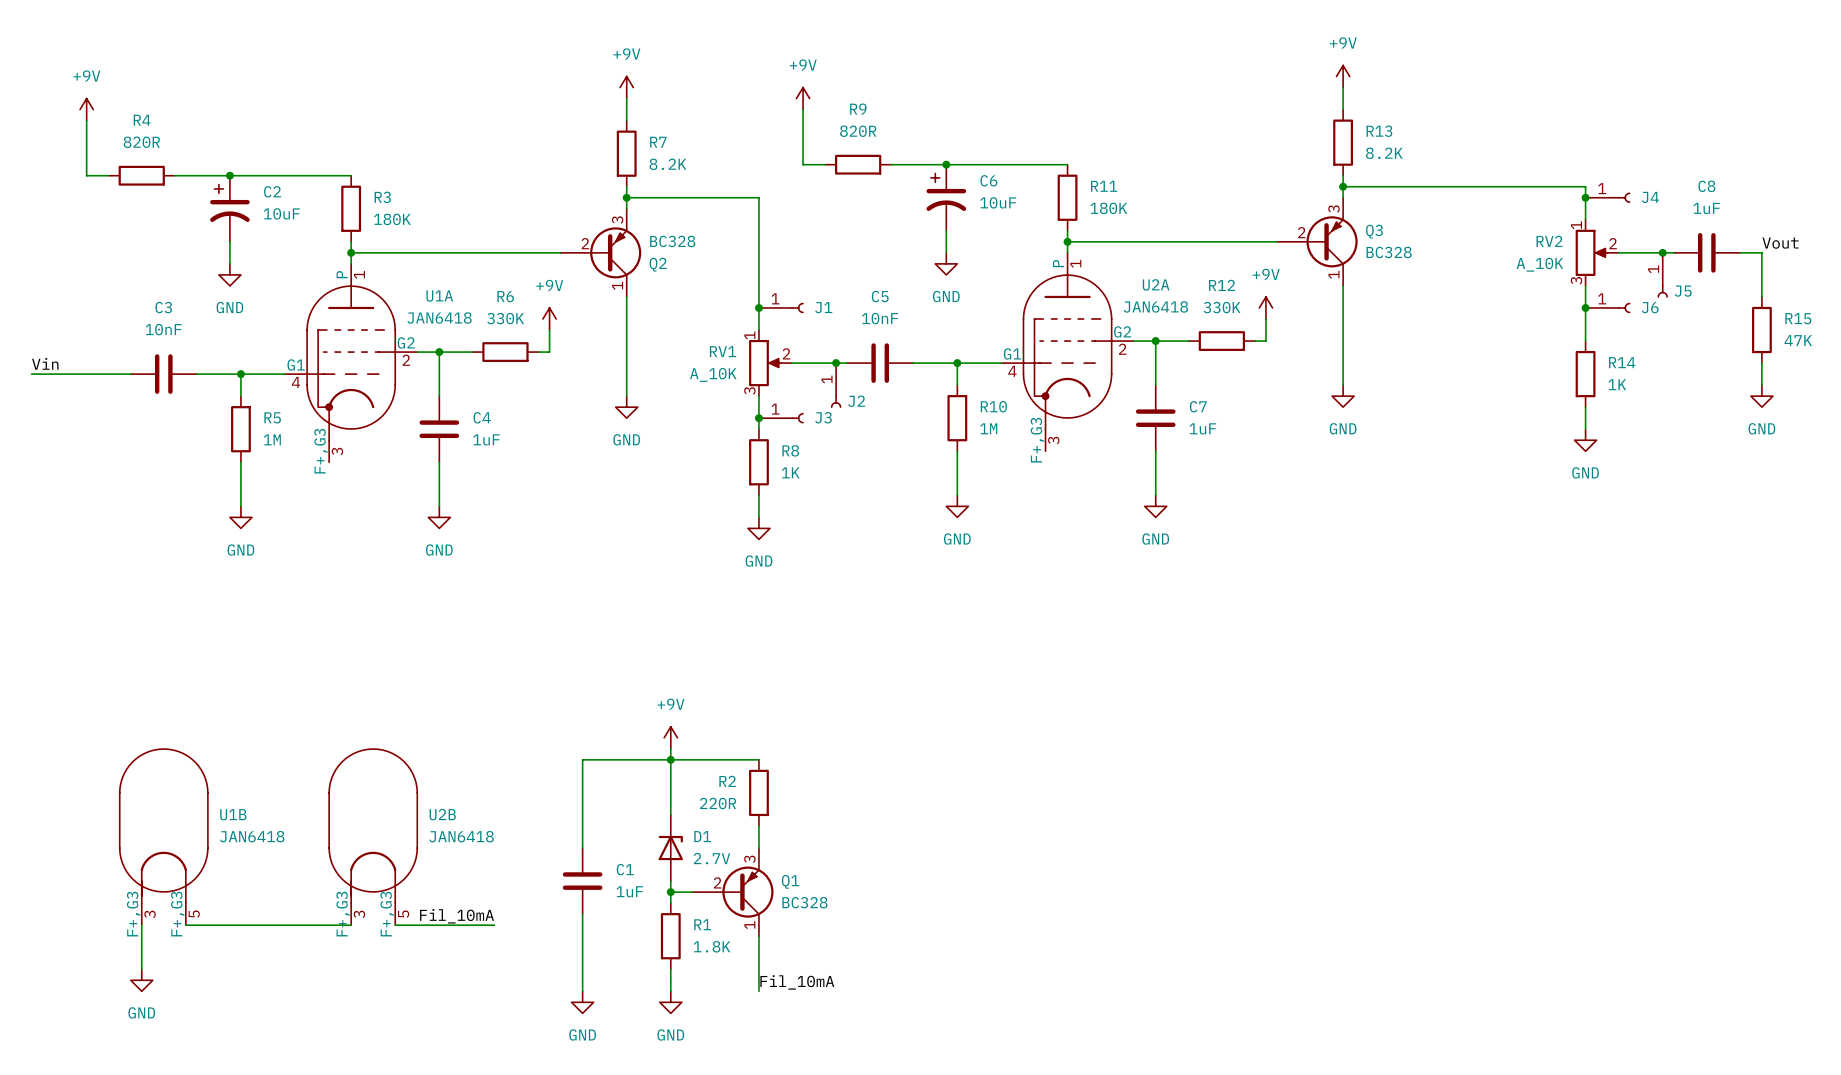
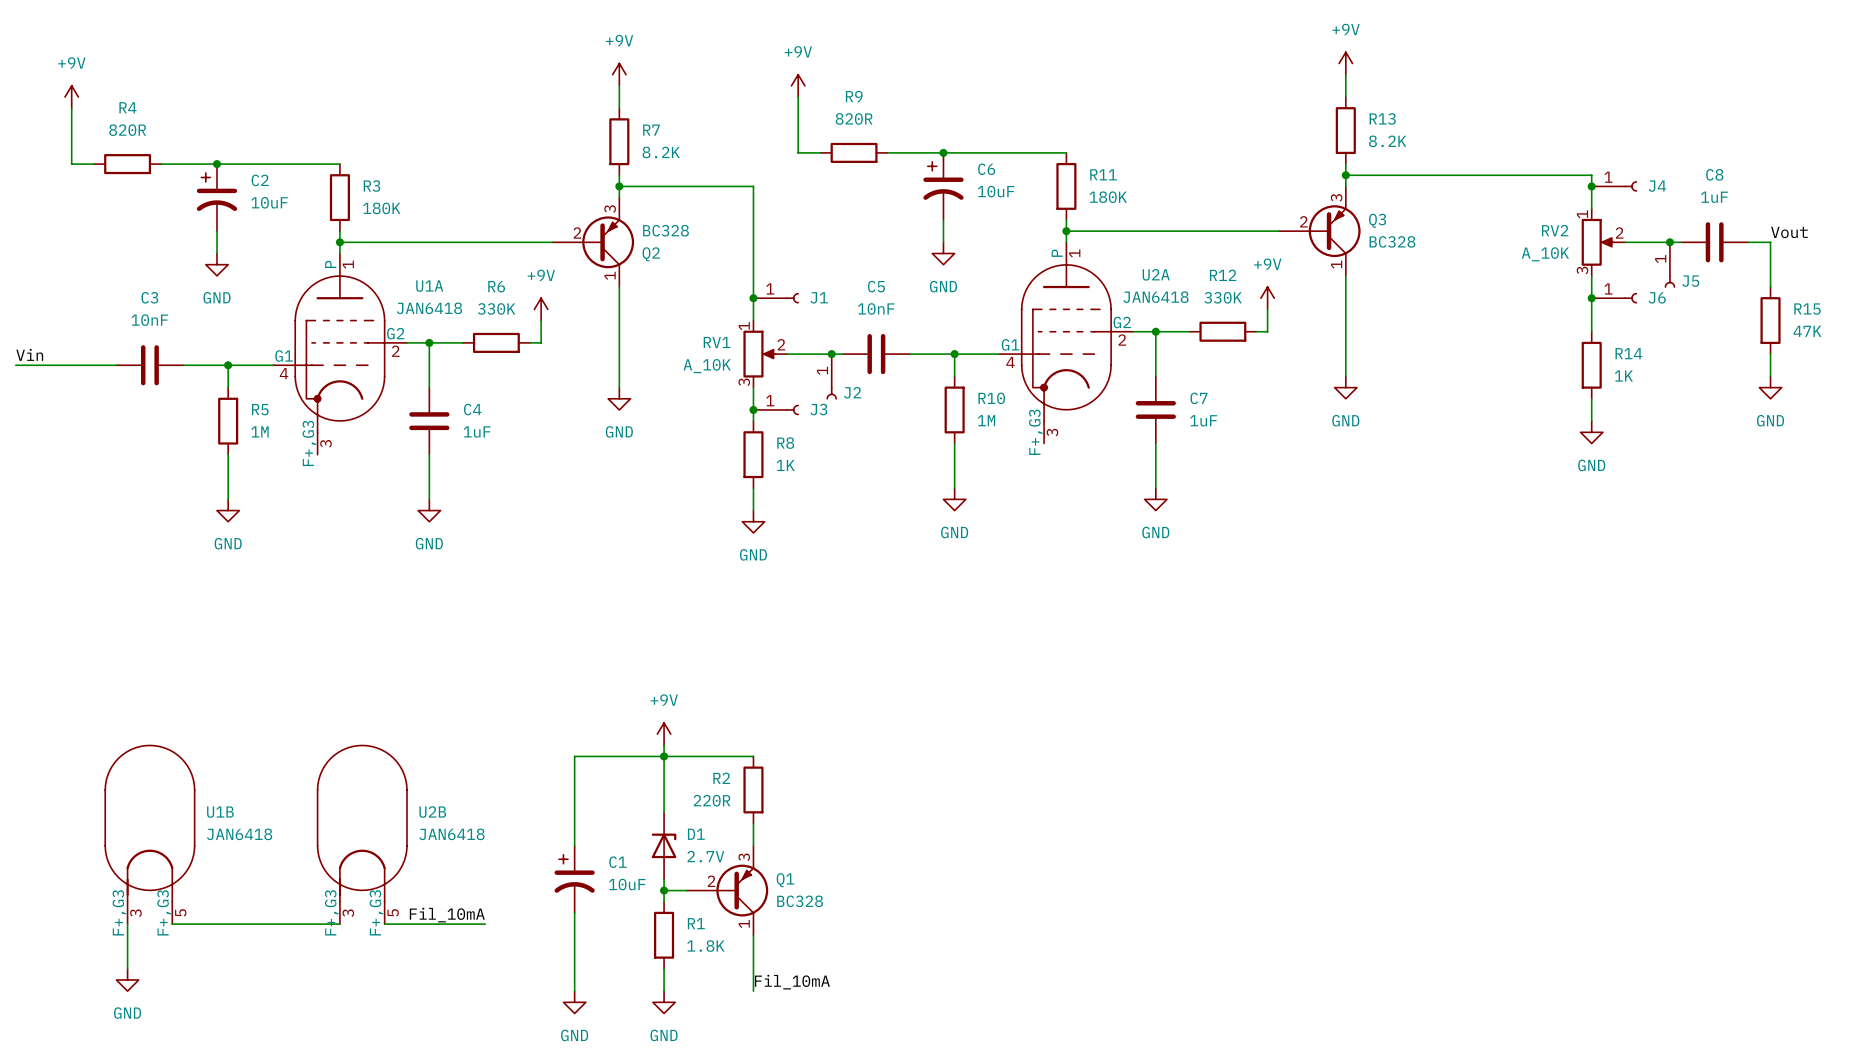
C1 symbol: [562, 848, 603, 915] -> [554, 845, 595, 913]
C1 value: 1uF (629, 891) -> 10uF (627, 884)

